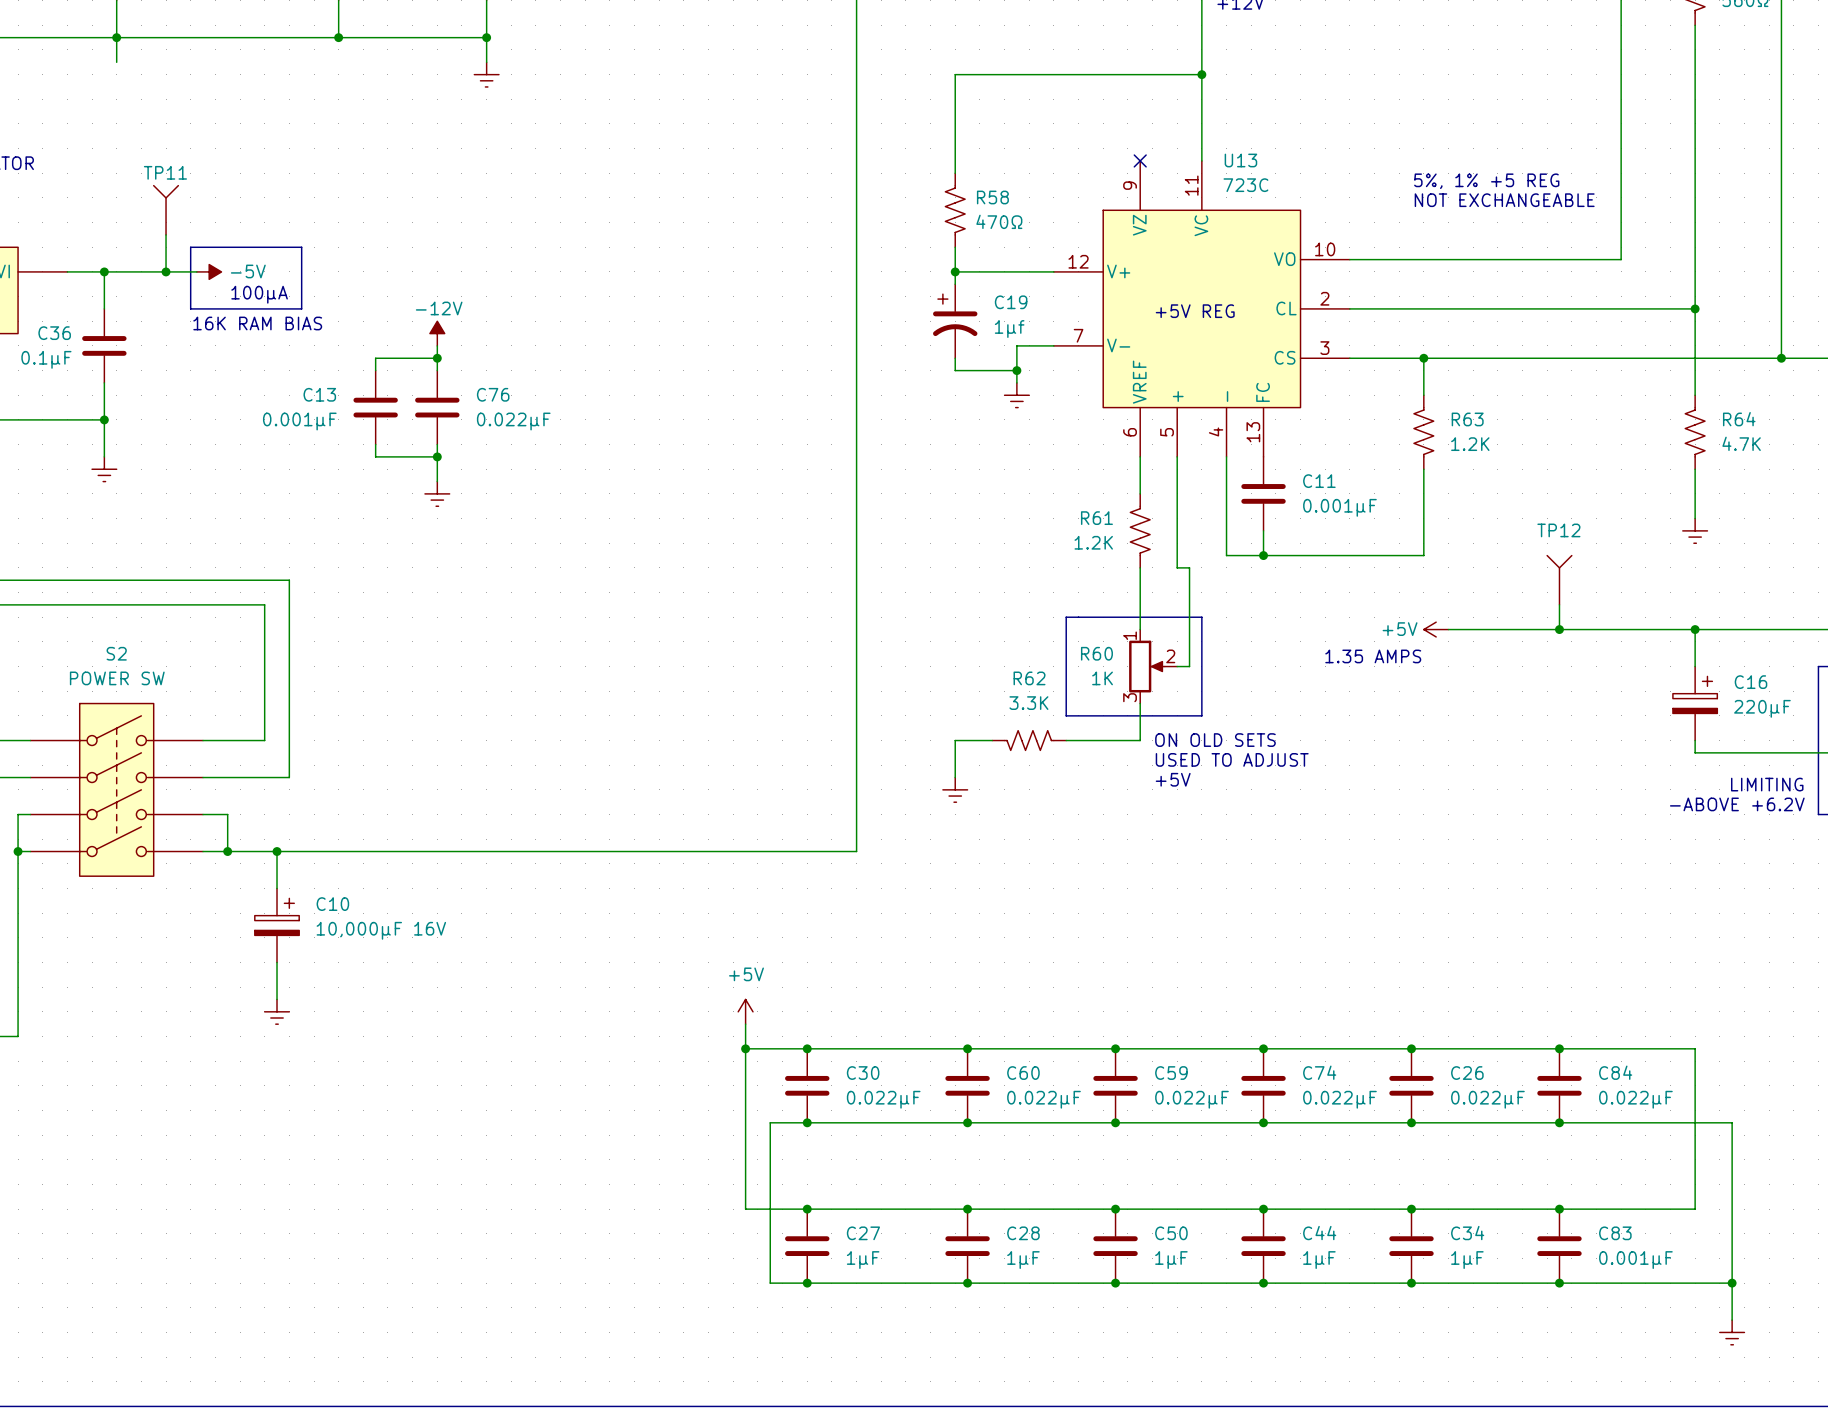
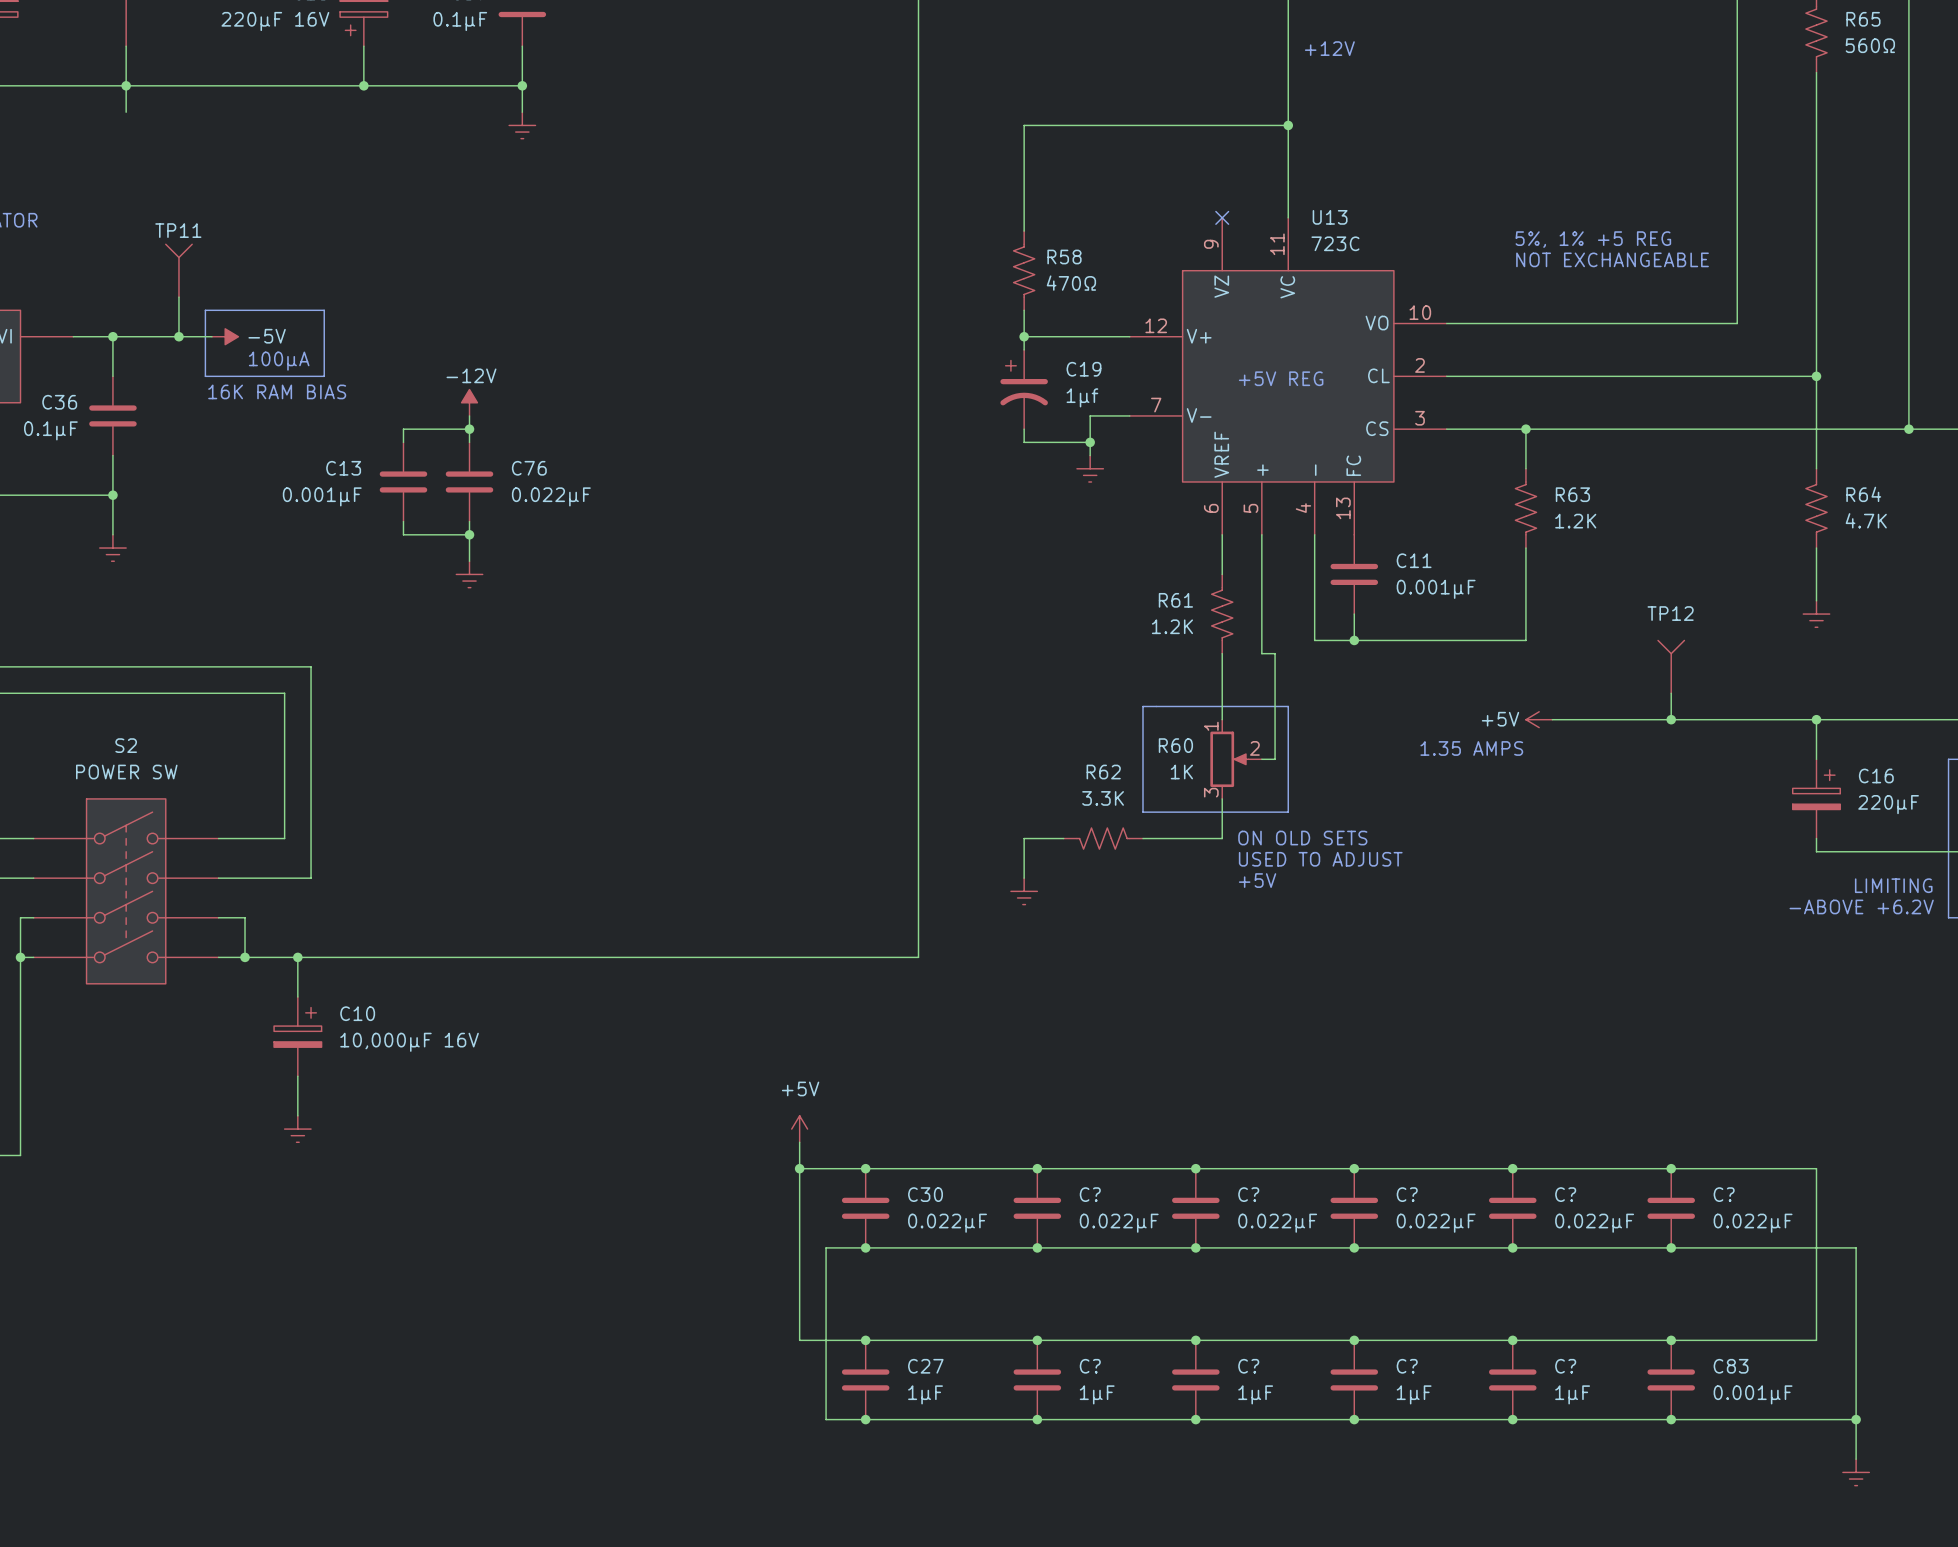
C74 name: C74 (1319, 1072) -> C? (1407, 1194)
C84 name: C84 (1615, 1072) -> C? (1724, 1194)
C60 name: C60 (1023, 1073) -> C? (1090, 1194)
C59 name: C59 (1171, 1073) -> C? (1248, 1194)
C26 name: C26 (1467, 1073) -> C? (1565, 1194)
C28 name: C28 (1023, 1233) -> C? (1090, 1366)
C50 name: C50 (1171, 1233) -> C? (1248, 1366)
C44 name: C44 (1319, 1233) -> C? (1407, 1366)
C34 name: C34 (1467, 1233) -> C? (1565, 1366)

